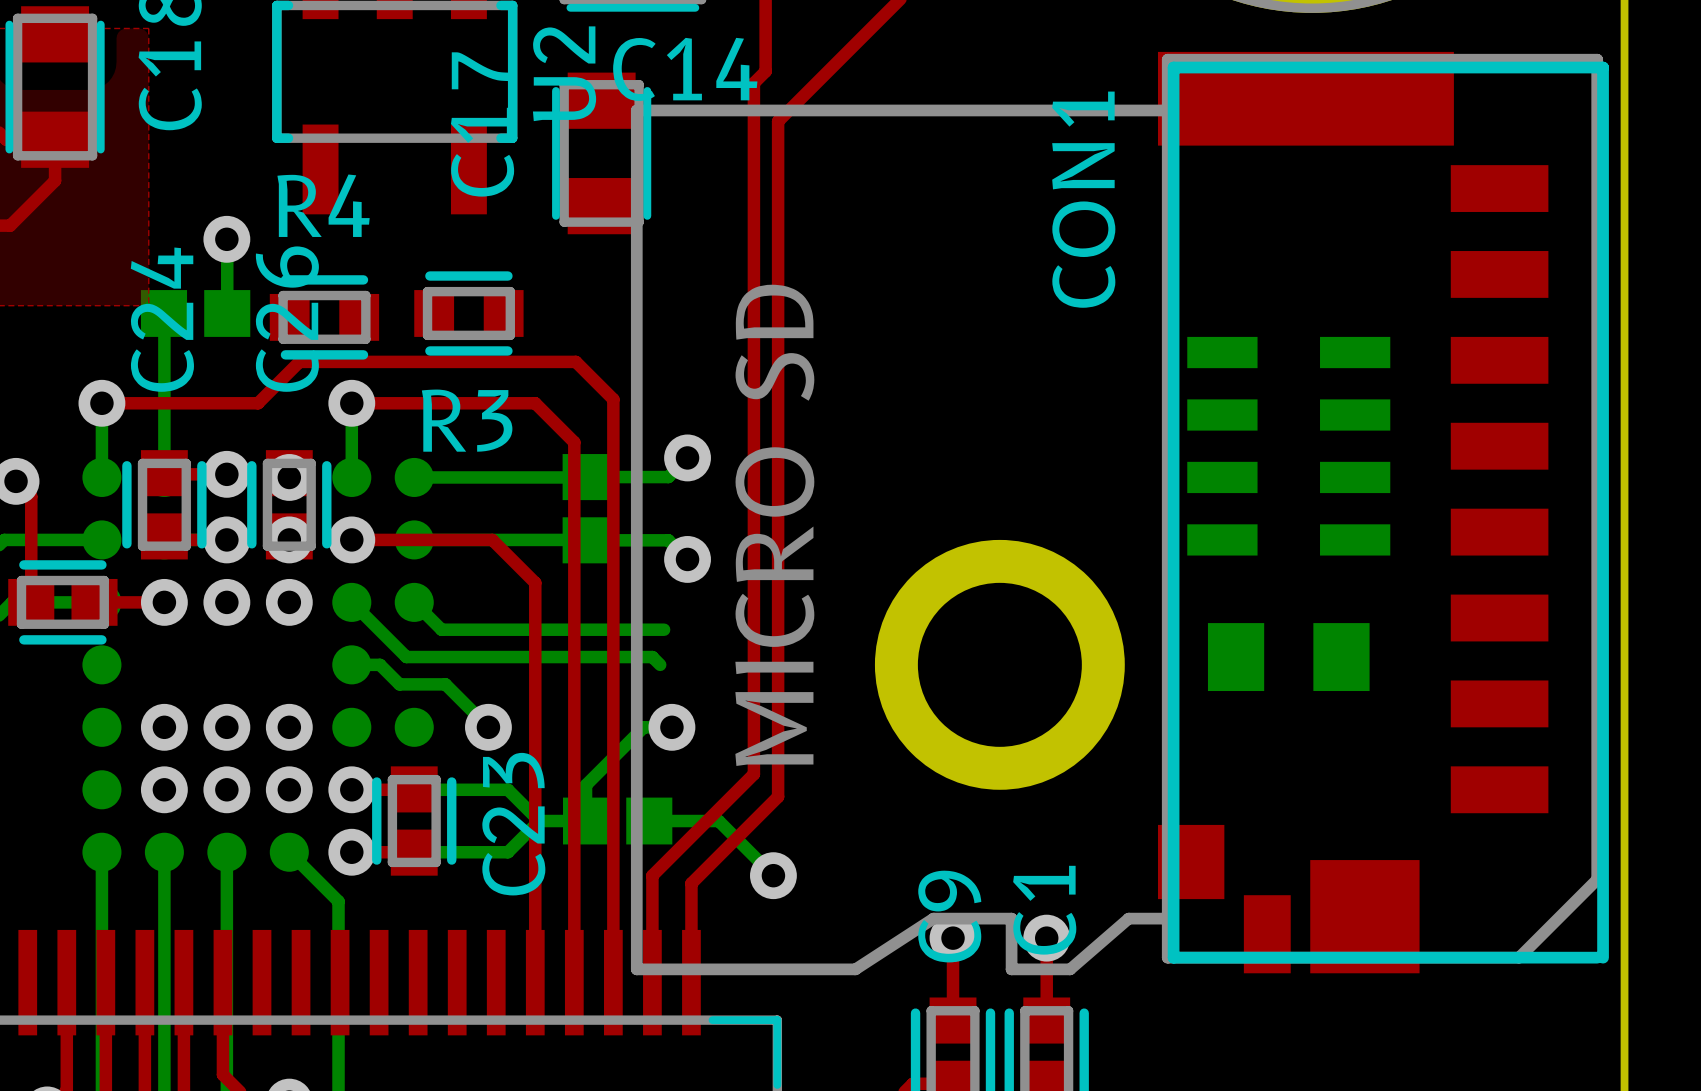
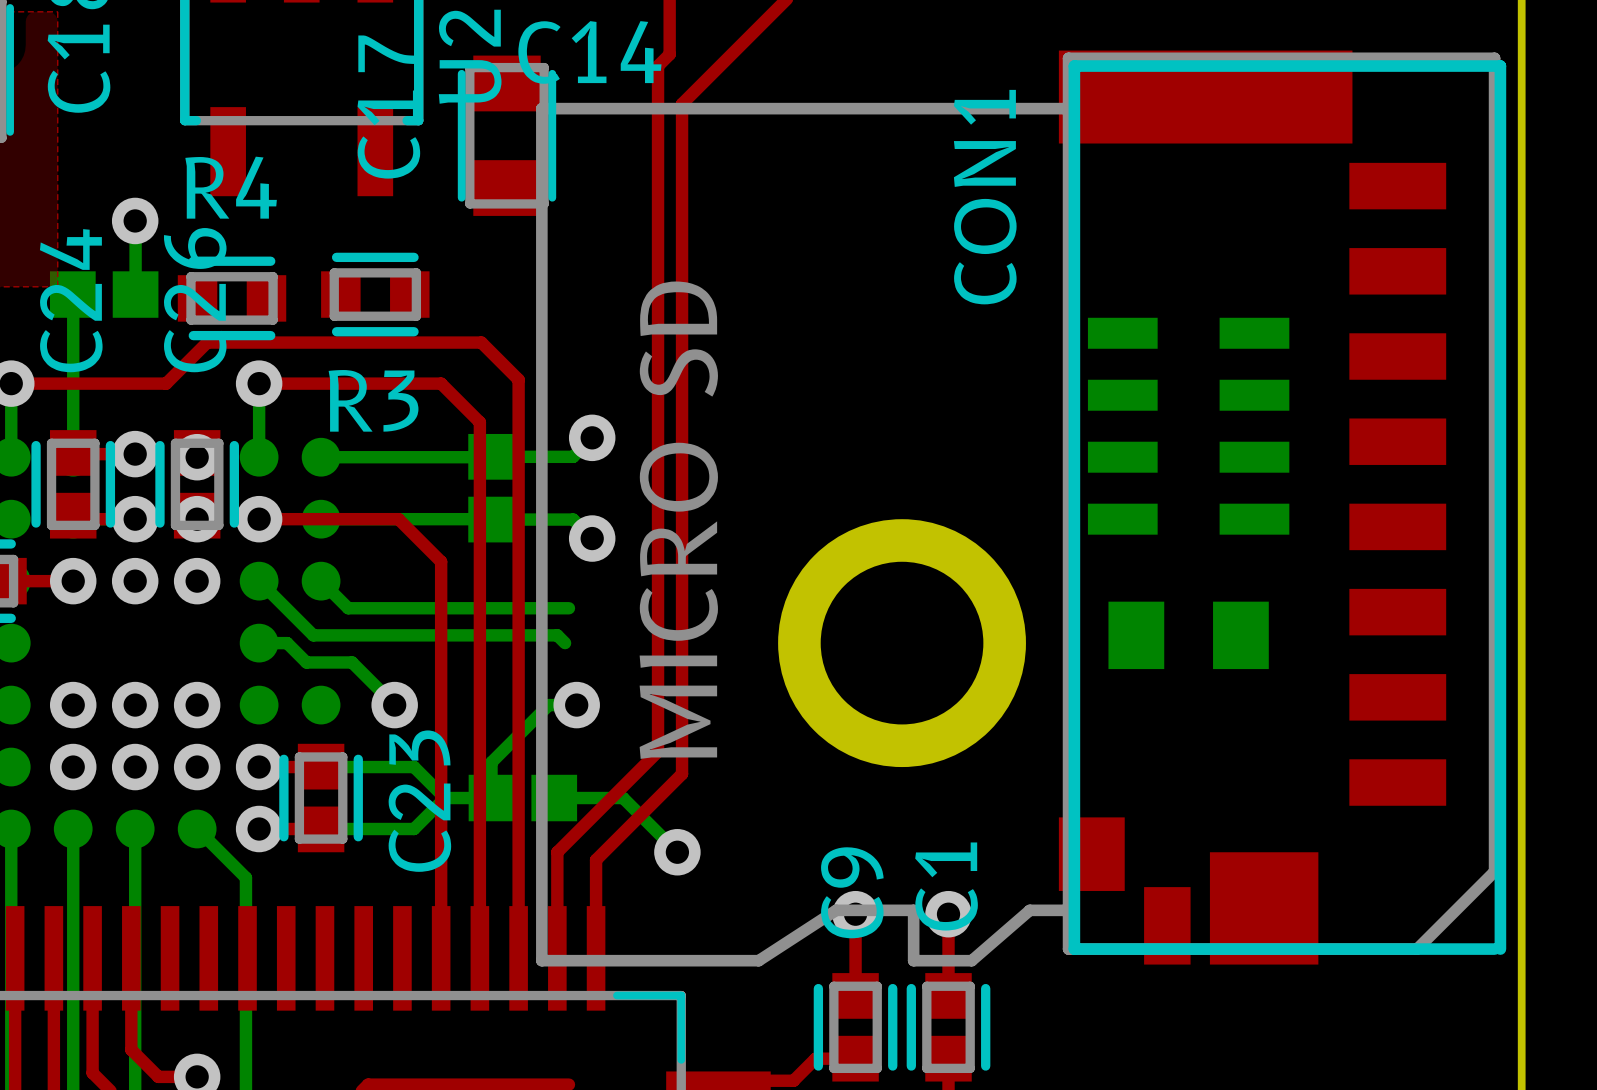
CON1 position: (1119, 513) -> (1021, 508)

